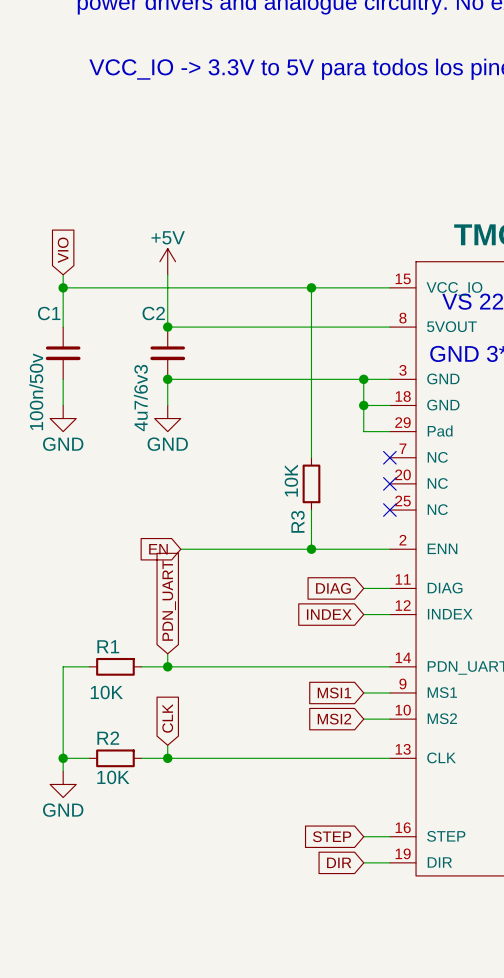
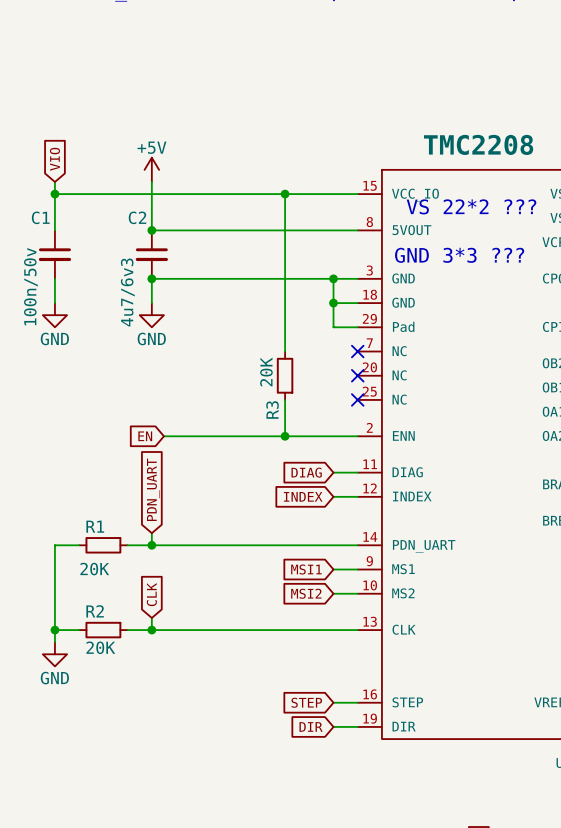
R3 value: 10K (291, 480) -> 20K (266, 371)
R1 value: 10K (106, 692) -> 20K (94, 569)
R2 value: 10K (113, 777) -> 20K (100, 647)

